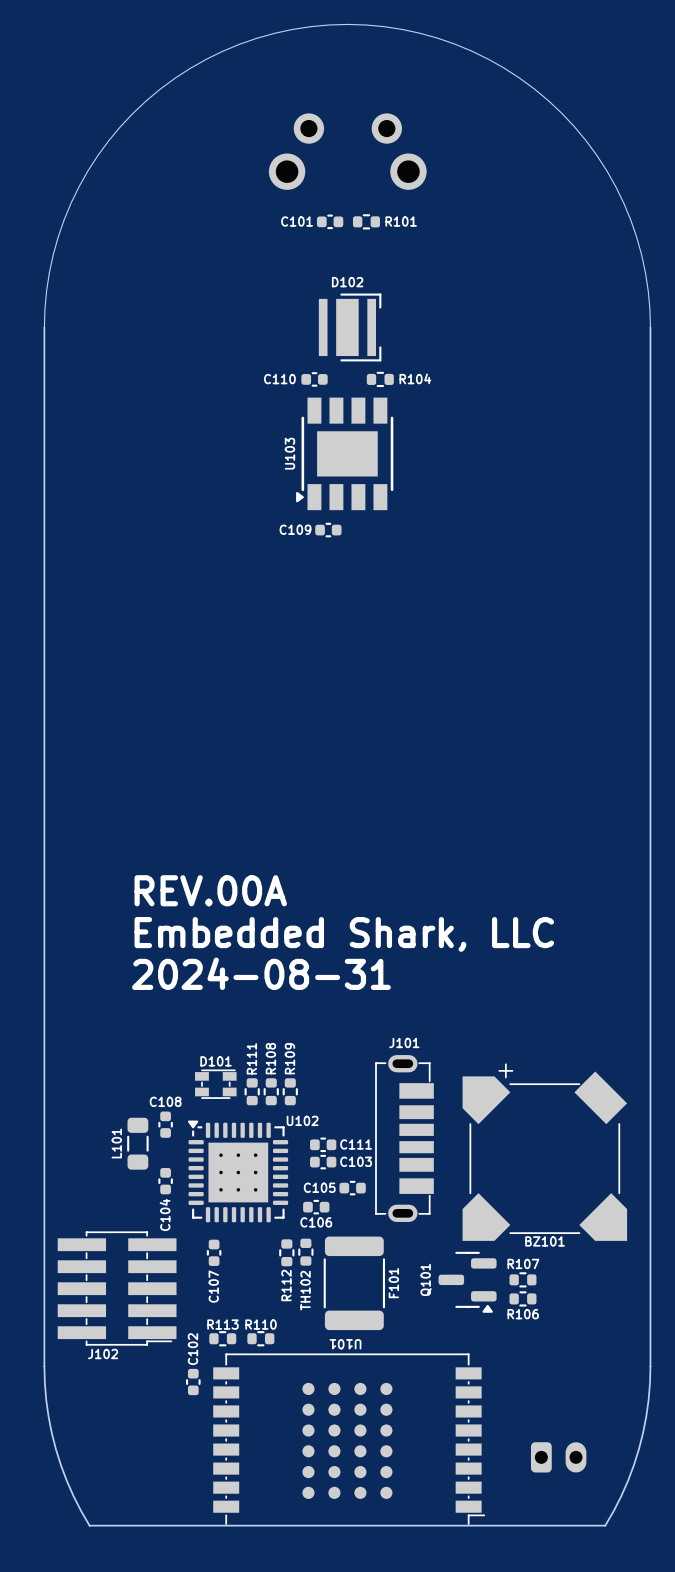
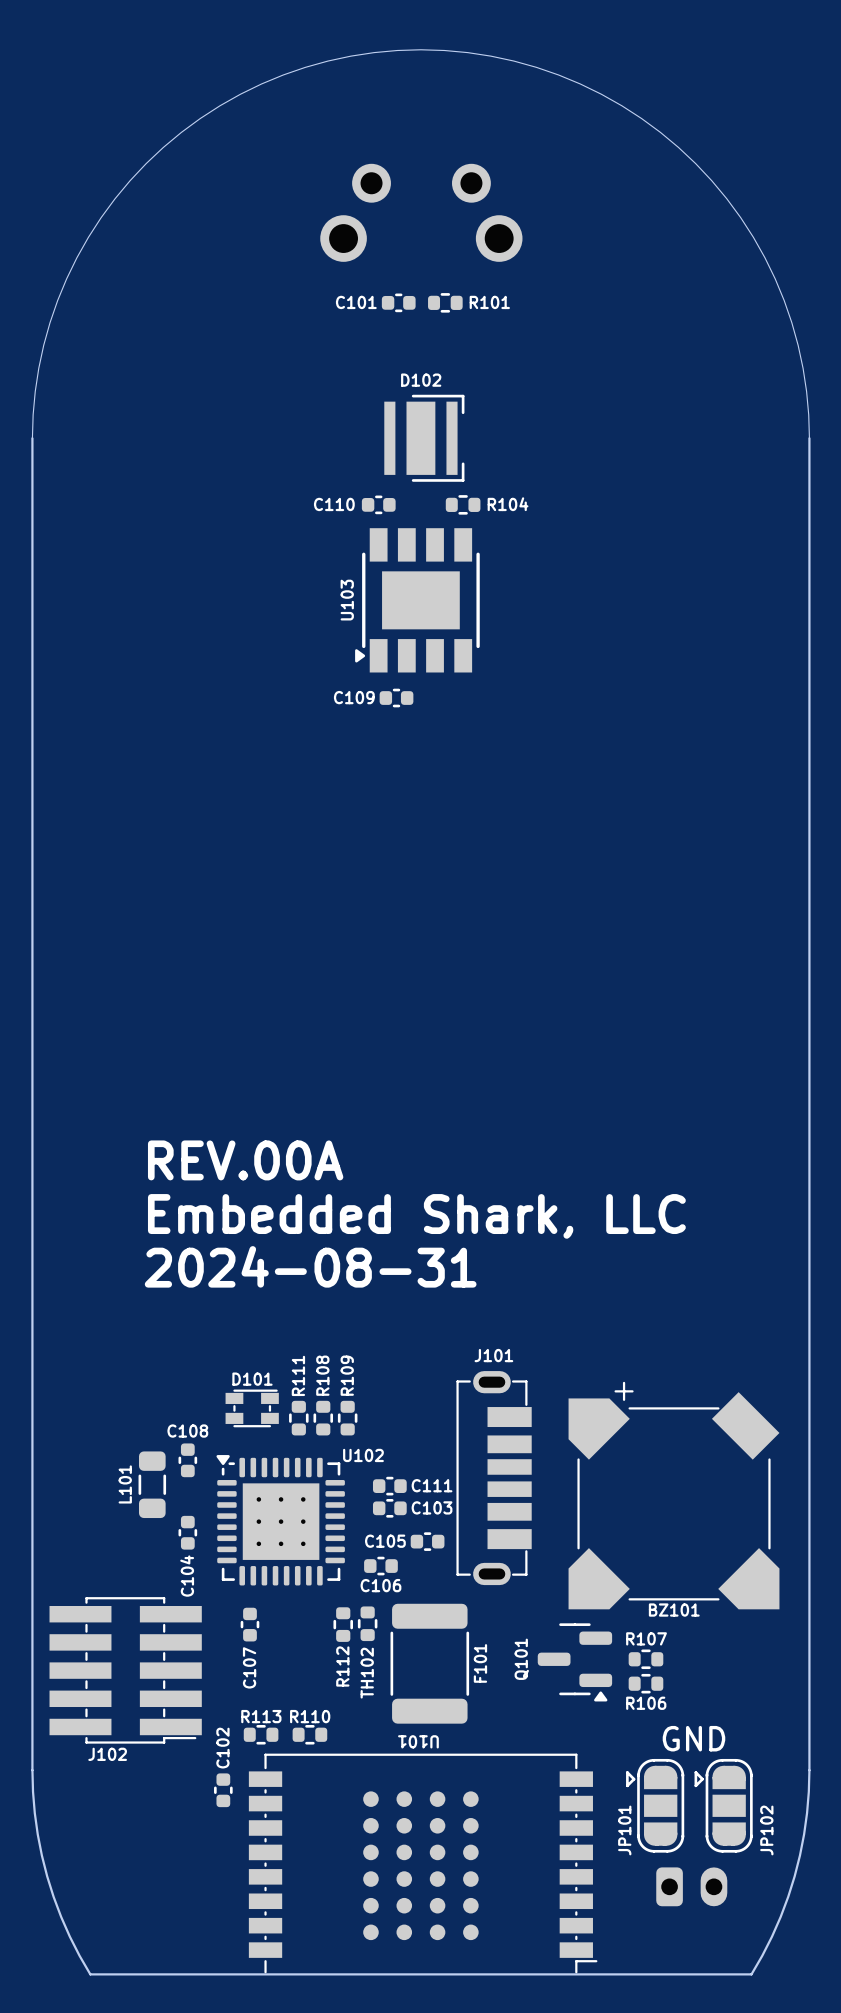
text: none -> GND (693, 1738)
JP101: none -> (655, 1805)
JP102: none -> (723, 1805)

